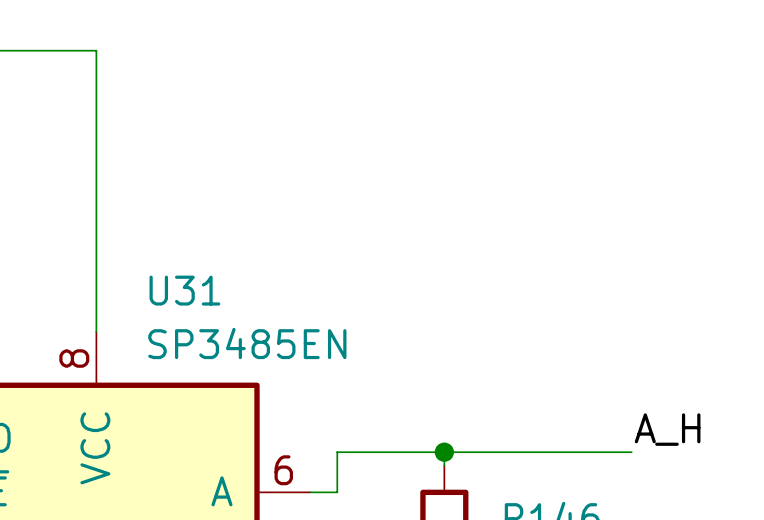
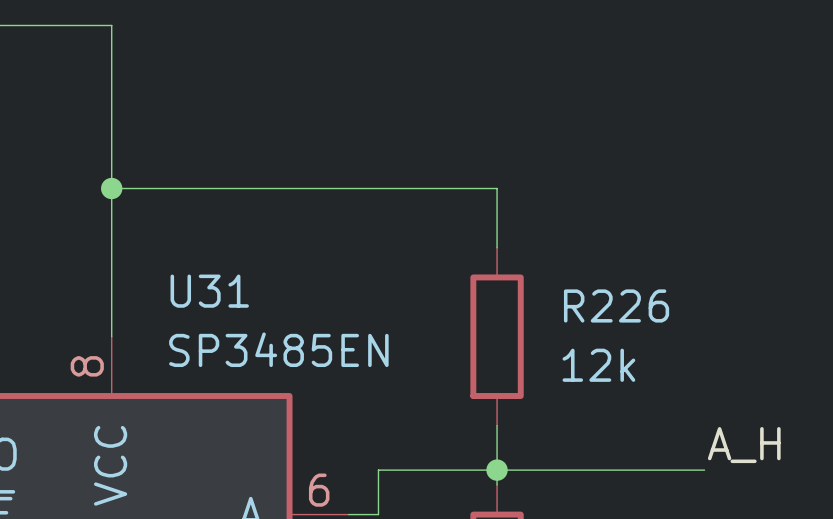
wire: none -> (111, 188) (497, 188) (497, 247)
junction: none -> (111, 188)
R226: none -> 12k (497, 336)
wire: none -> (497, 425) (497, 470)

